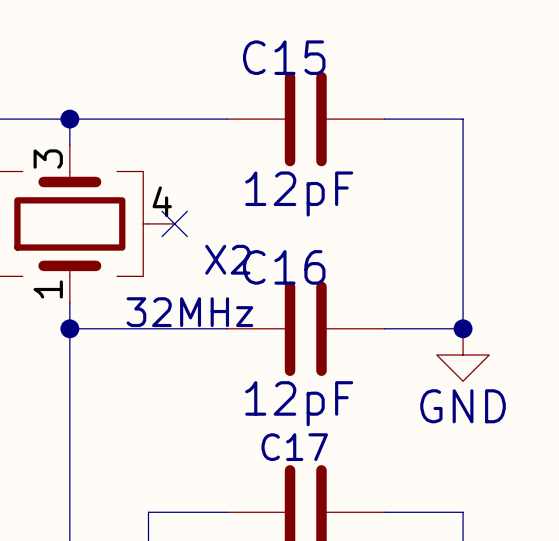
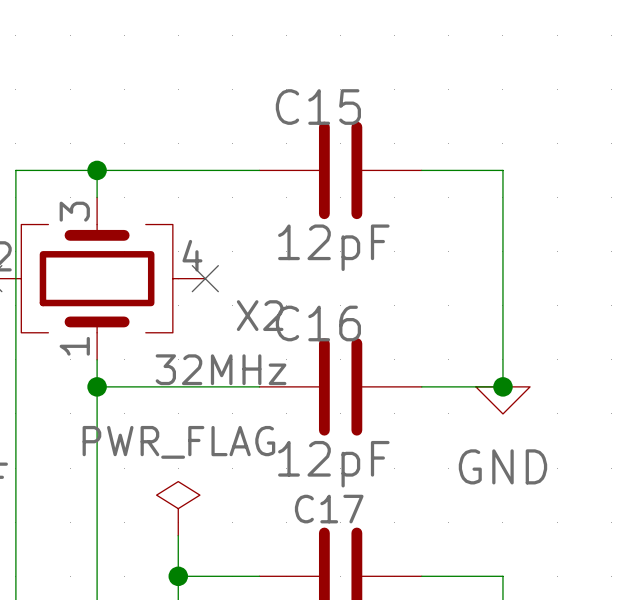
power symbol shape: [436, 328, 490, 382] -> [475, 386, 531, 414]
power symbol: none -> PWR_FLAG (178, 508)
wire: none -> (178, 535) (178, 576)
junction: none -> (178, 576)

